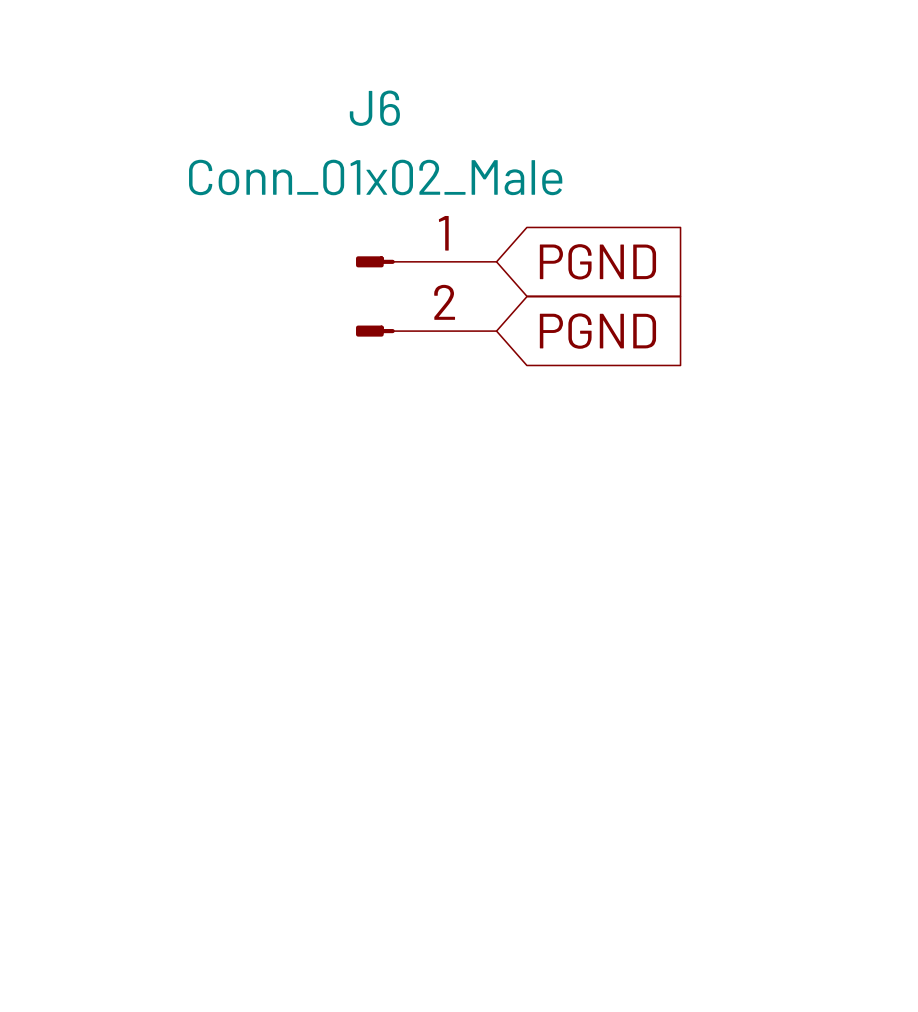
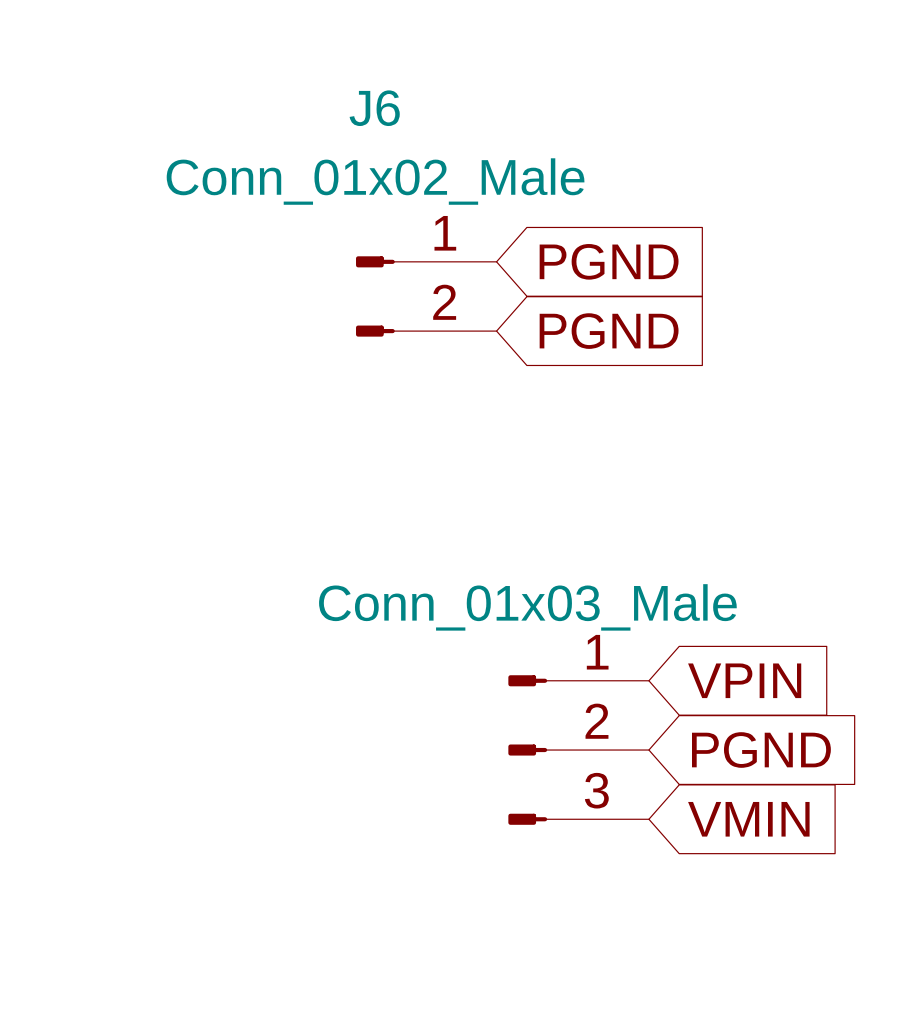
global label: none -> VPIN (744, 680)
part: none -> Conn_01x03_Male (578, 750)
global label: none -> PGND (761, 750)
global label: none -> VMIN (748, 819)

